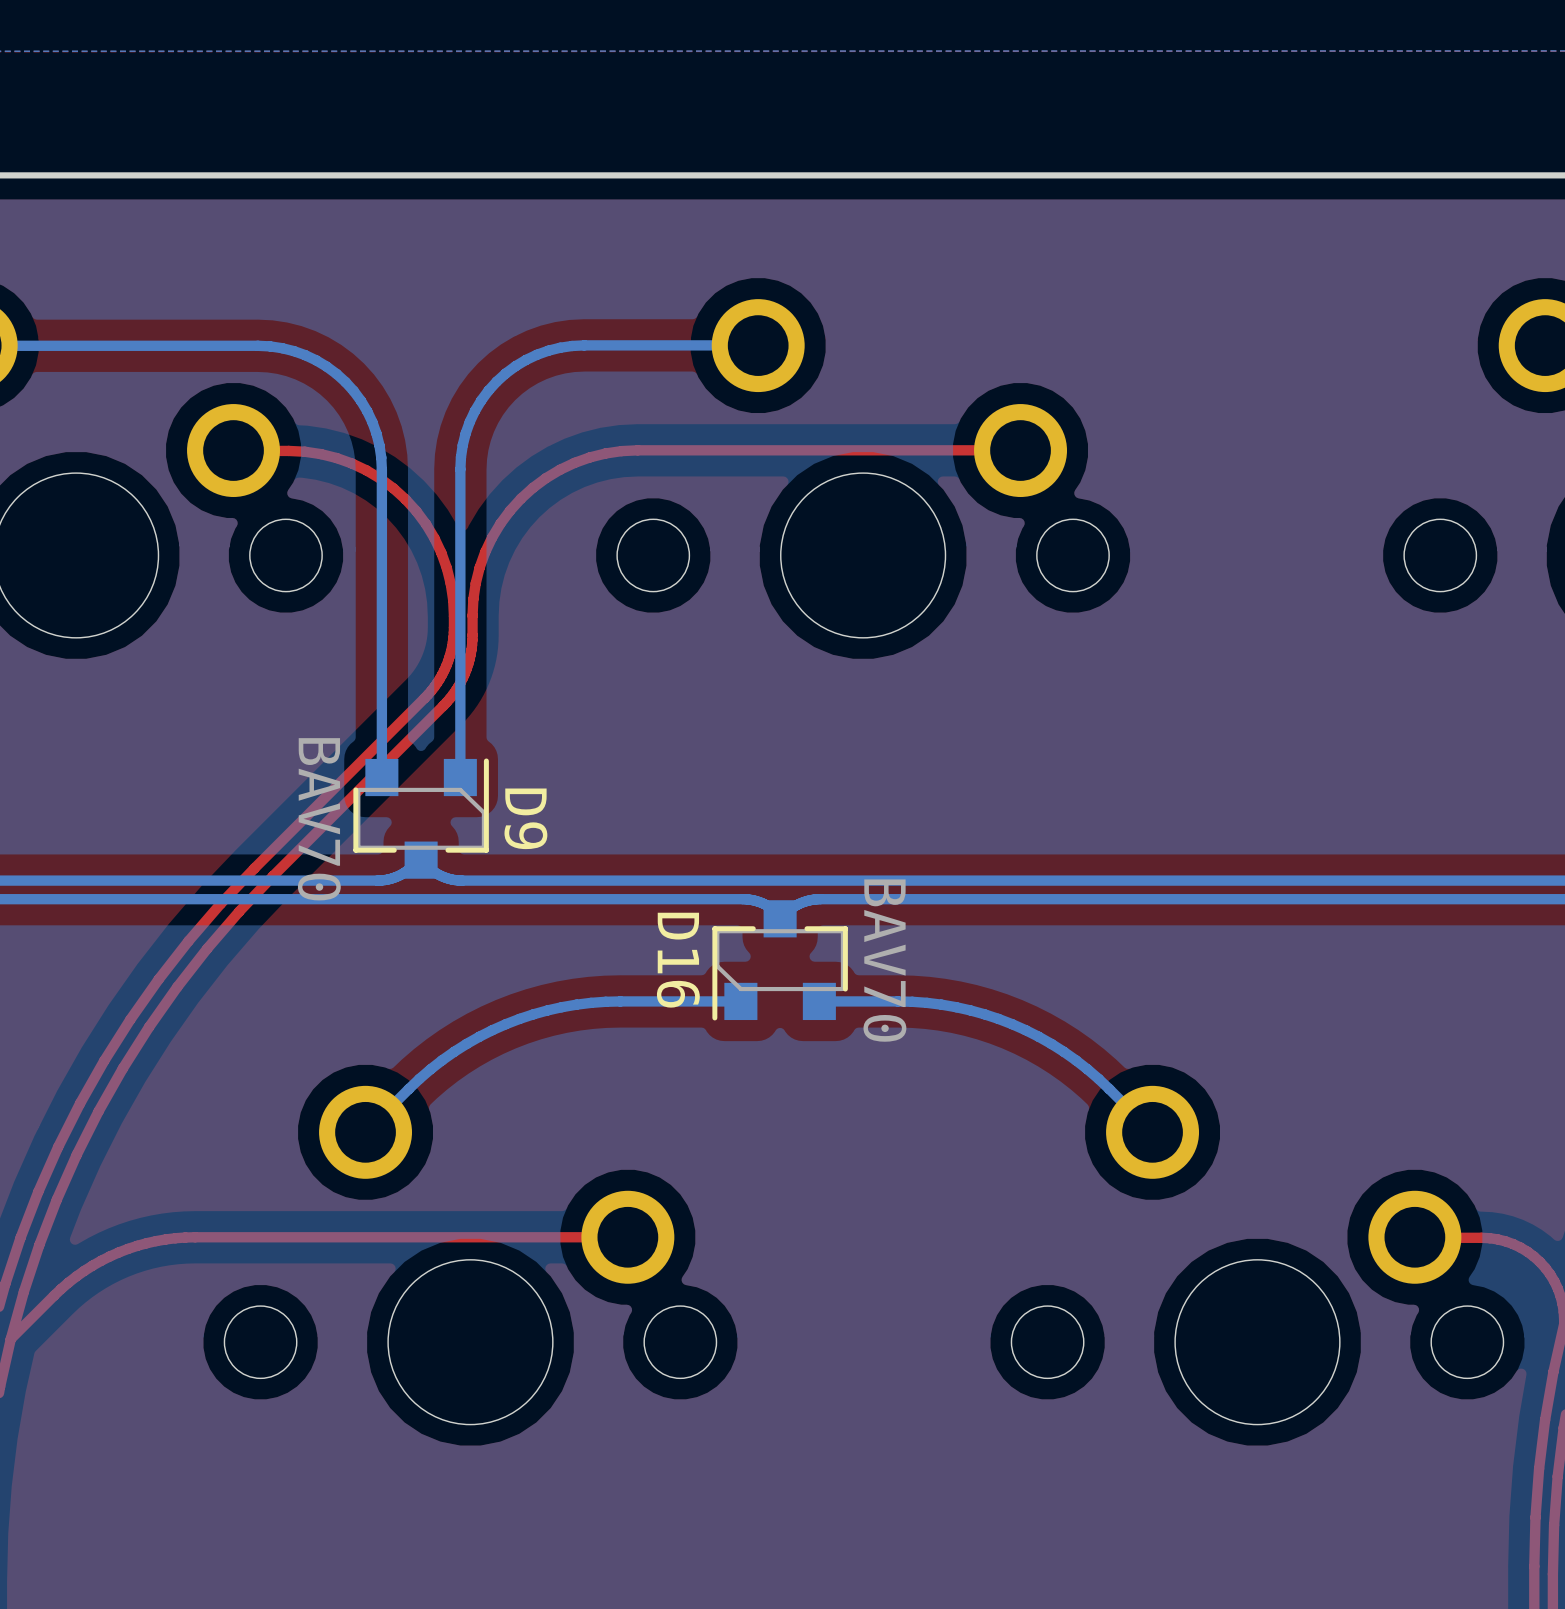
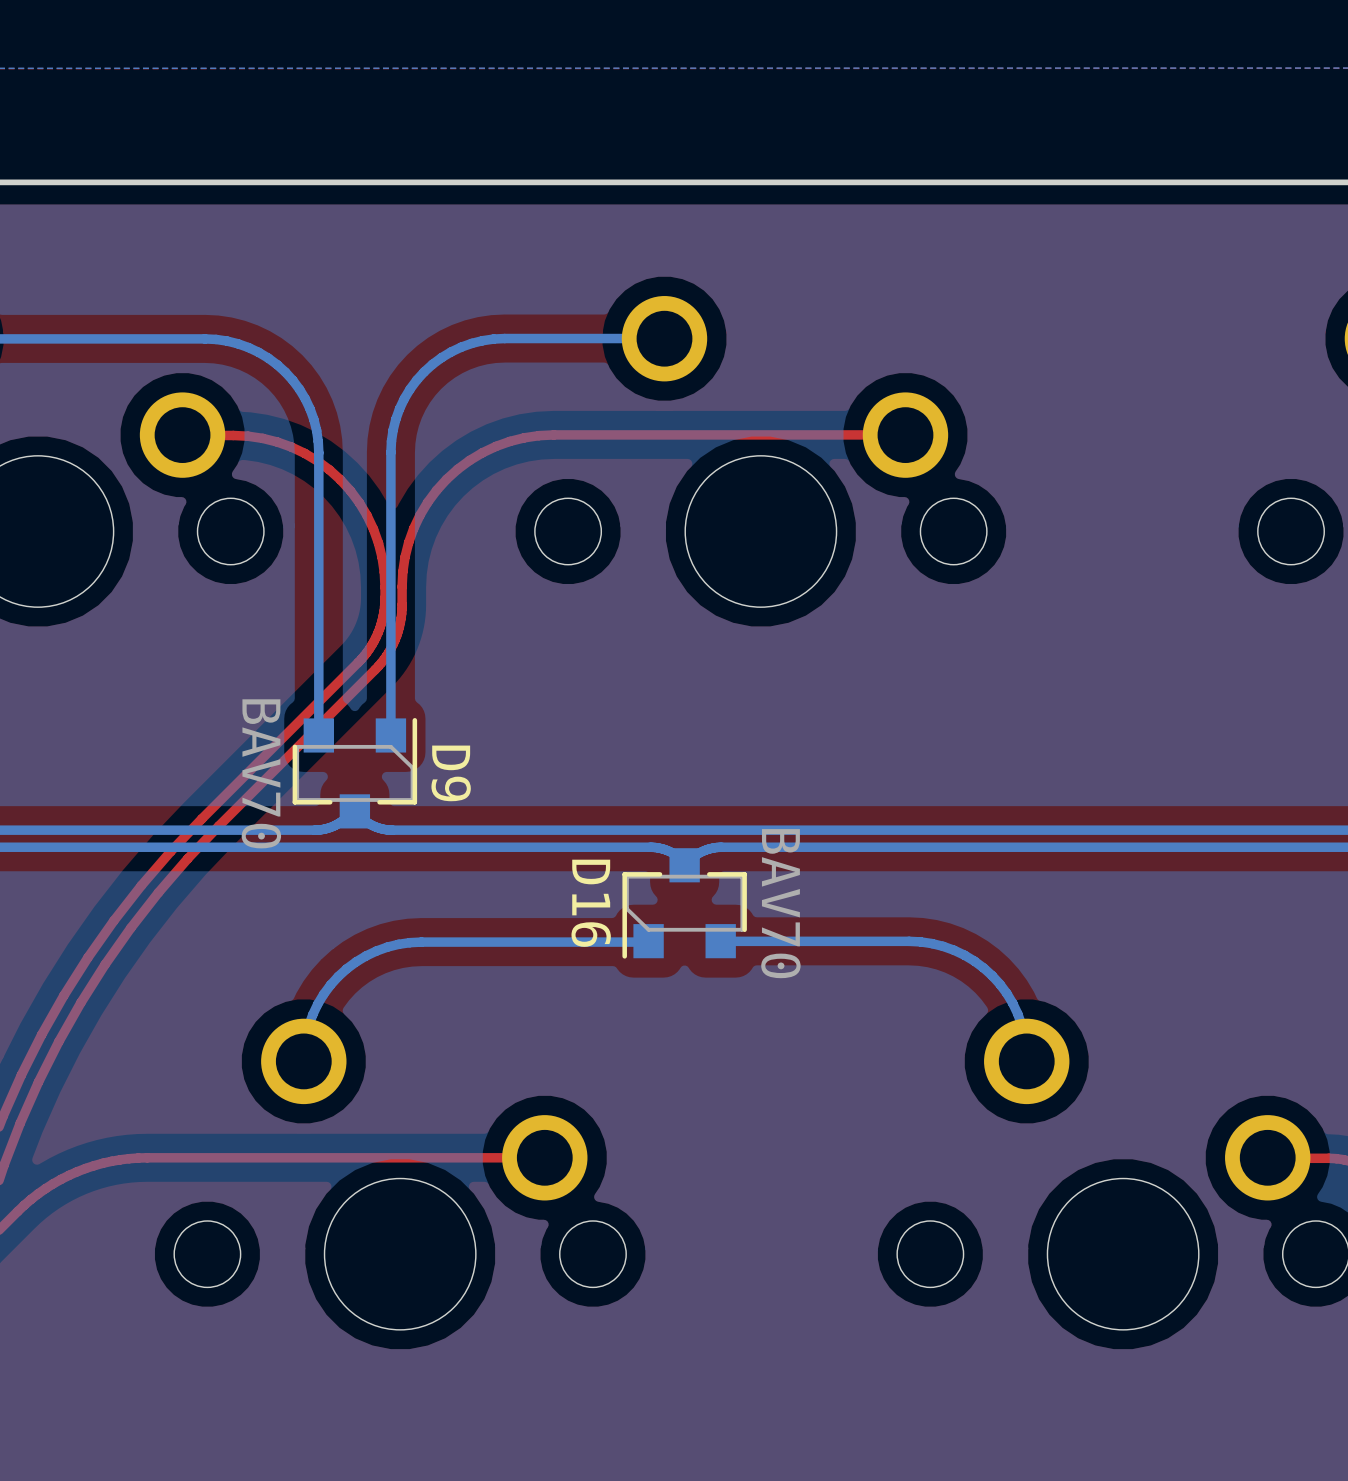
bottom track: (740, 1001) (591, 1002) (547, 1010) (519, 1018) (479, 1036) (442, 1060) (419, 1078) (365, 1132) -> (648, 941) (421, 942) (387, 947) (365, 955) (346, 968) (323, 994) (308, 1025) (303, 1061)
bottom track: (897, 1001) (927, 1002) (970, 1010) (998, 1018) (1038, 1036) (1087, 1069) (1149, 1129) -> (792, 941) (920, 941) (943, 946) (964, 955) (992, 975) (1012, 1003) (1024, 1036) (1026, 1061)

